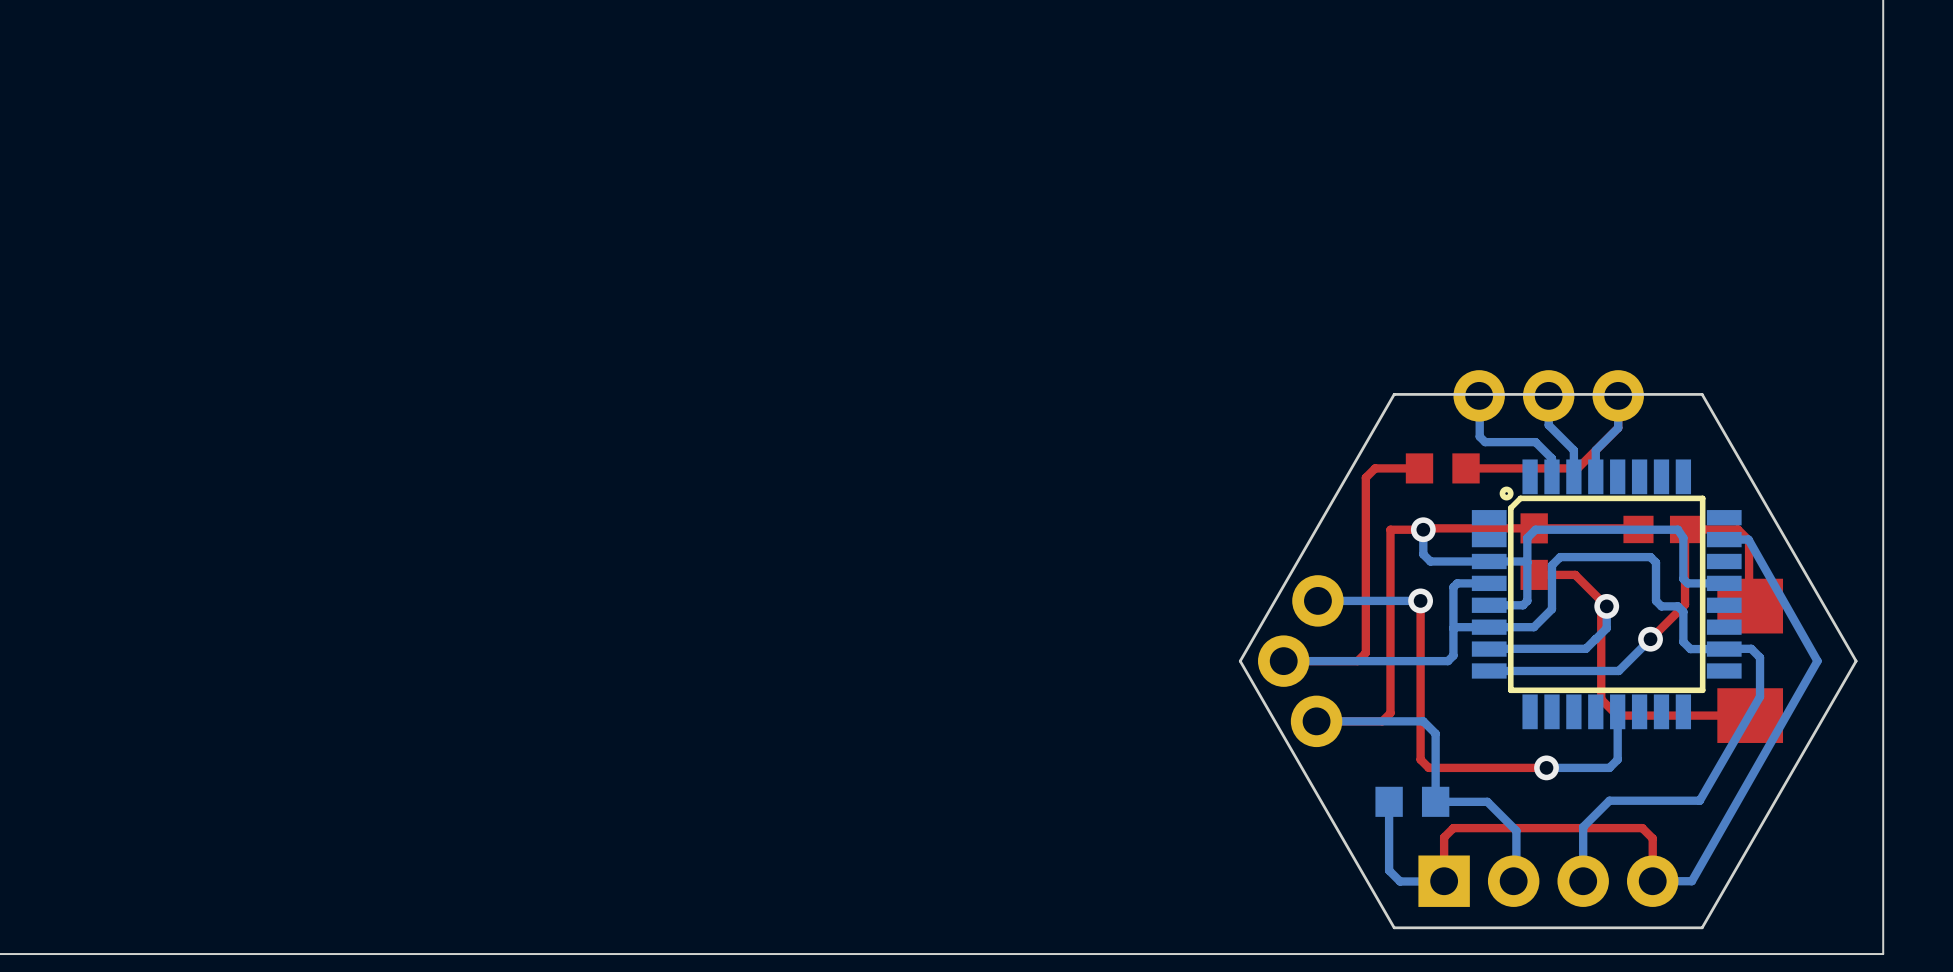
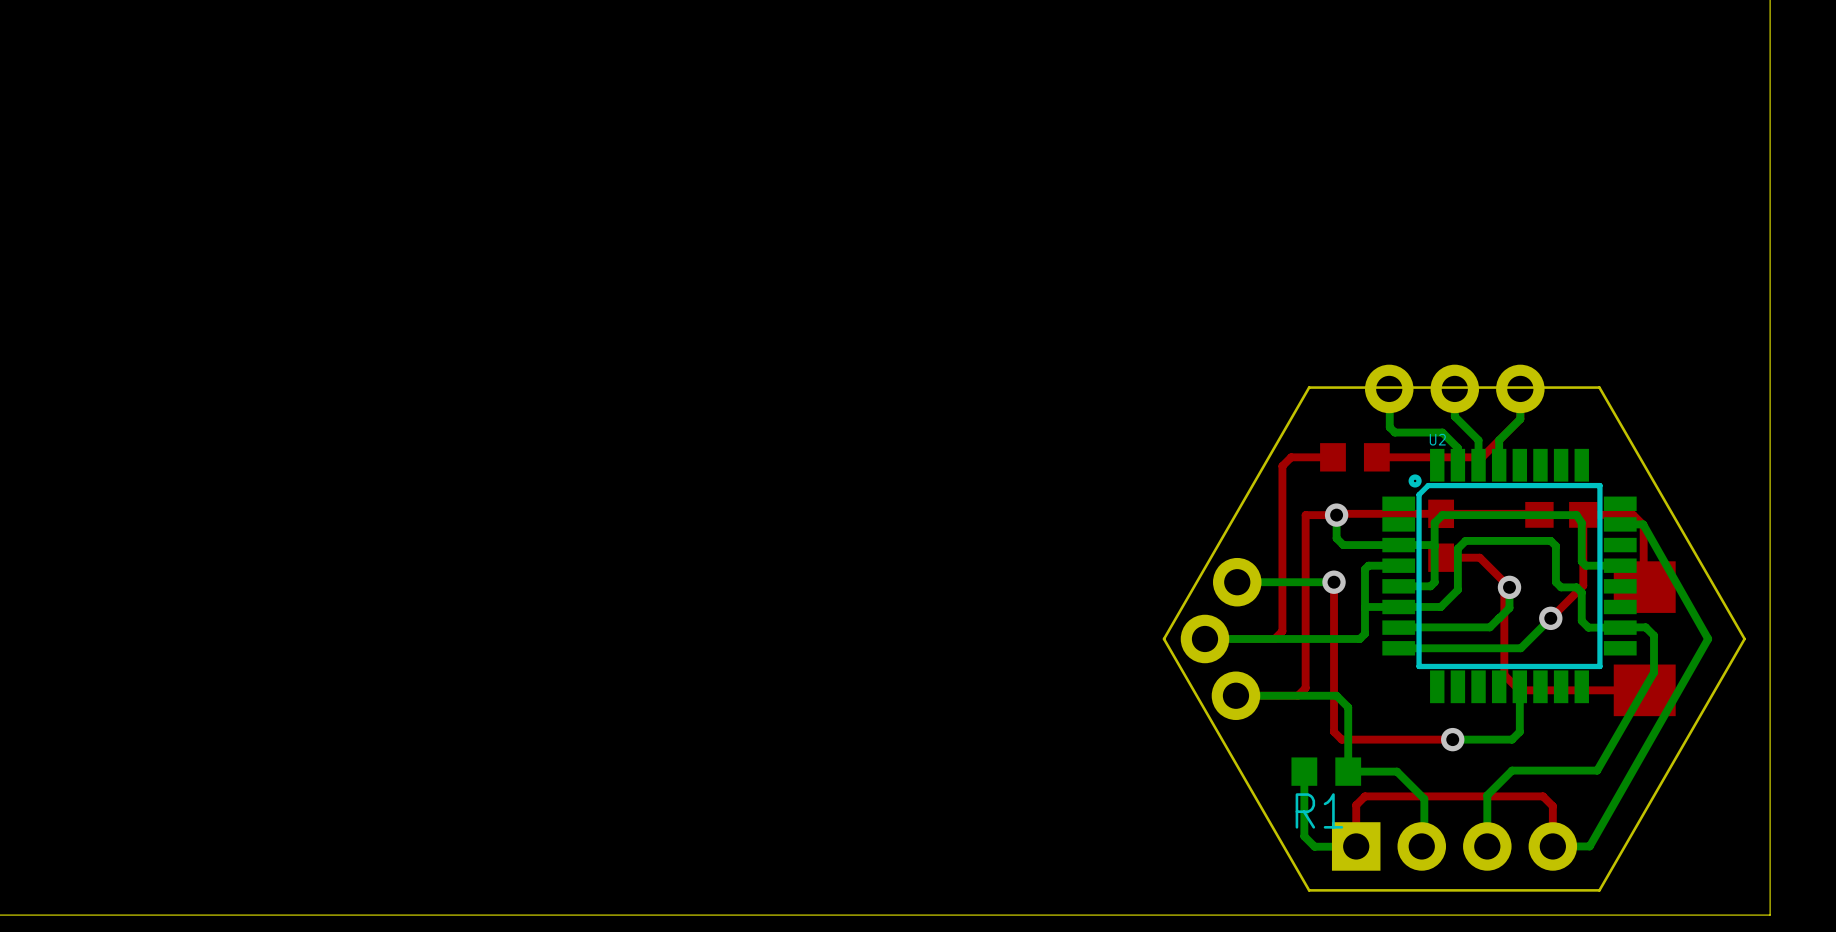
U2 name: none -> U2 (1437, 439)
R1 name: none -> R1 (1319, 810)

